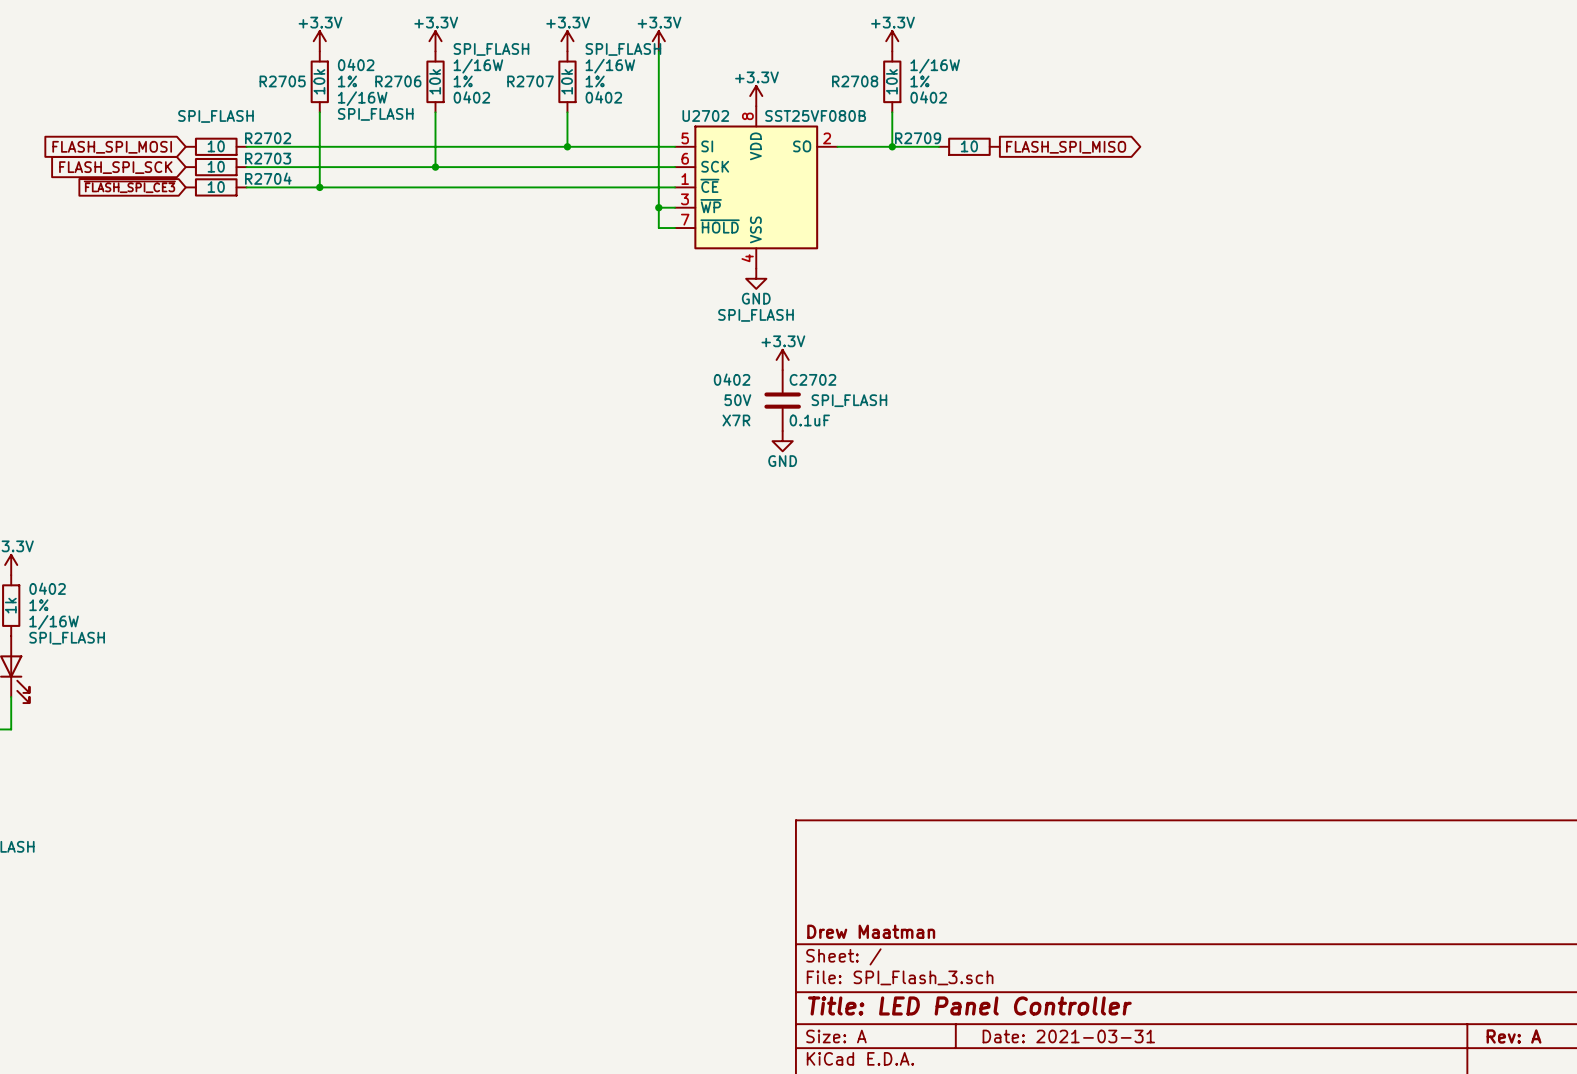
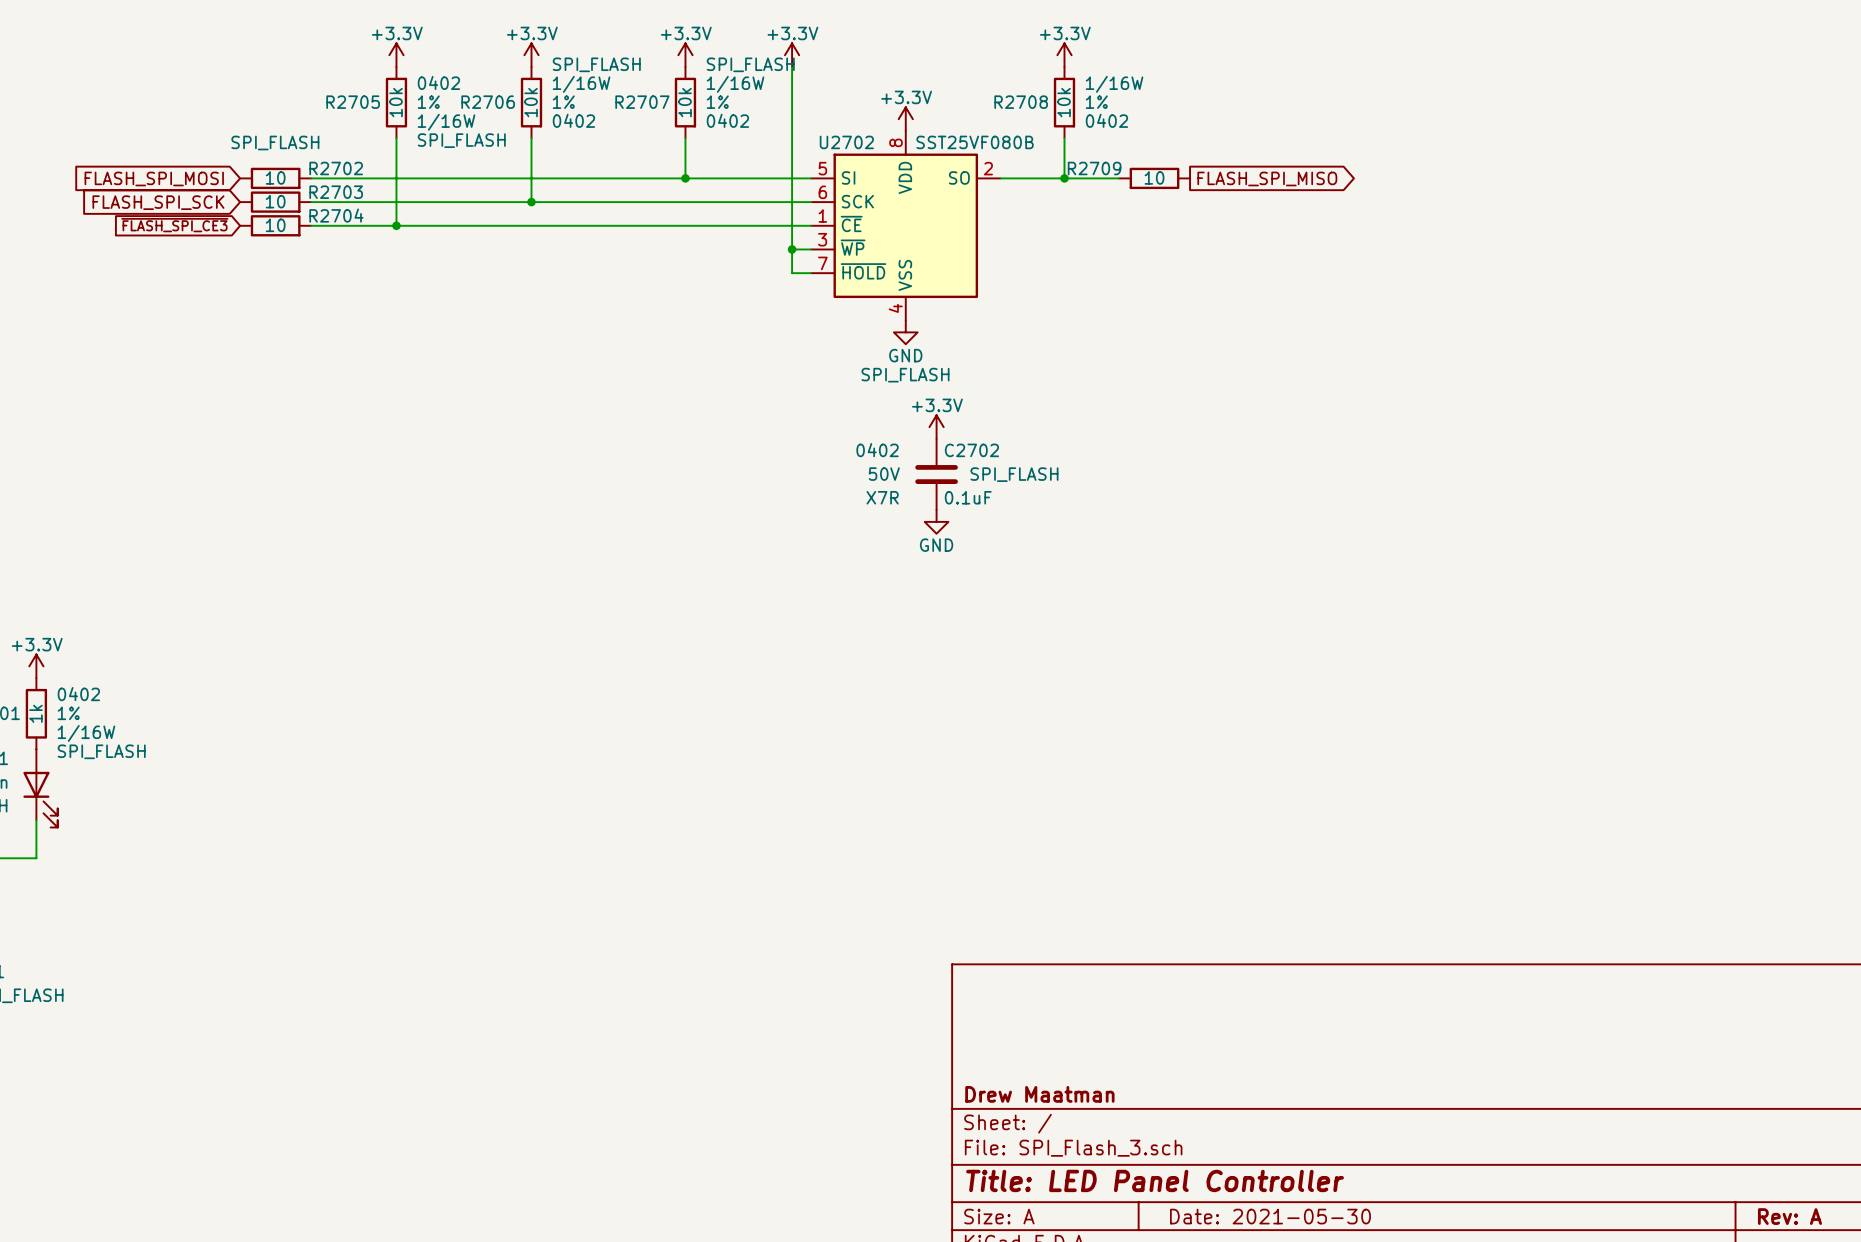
title block: Date: 2021-03-31 (1068, 1036) -> Date: 2021-05-30 (1270, 1216)

